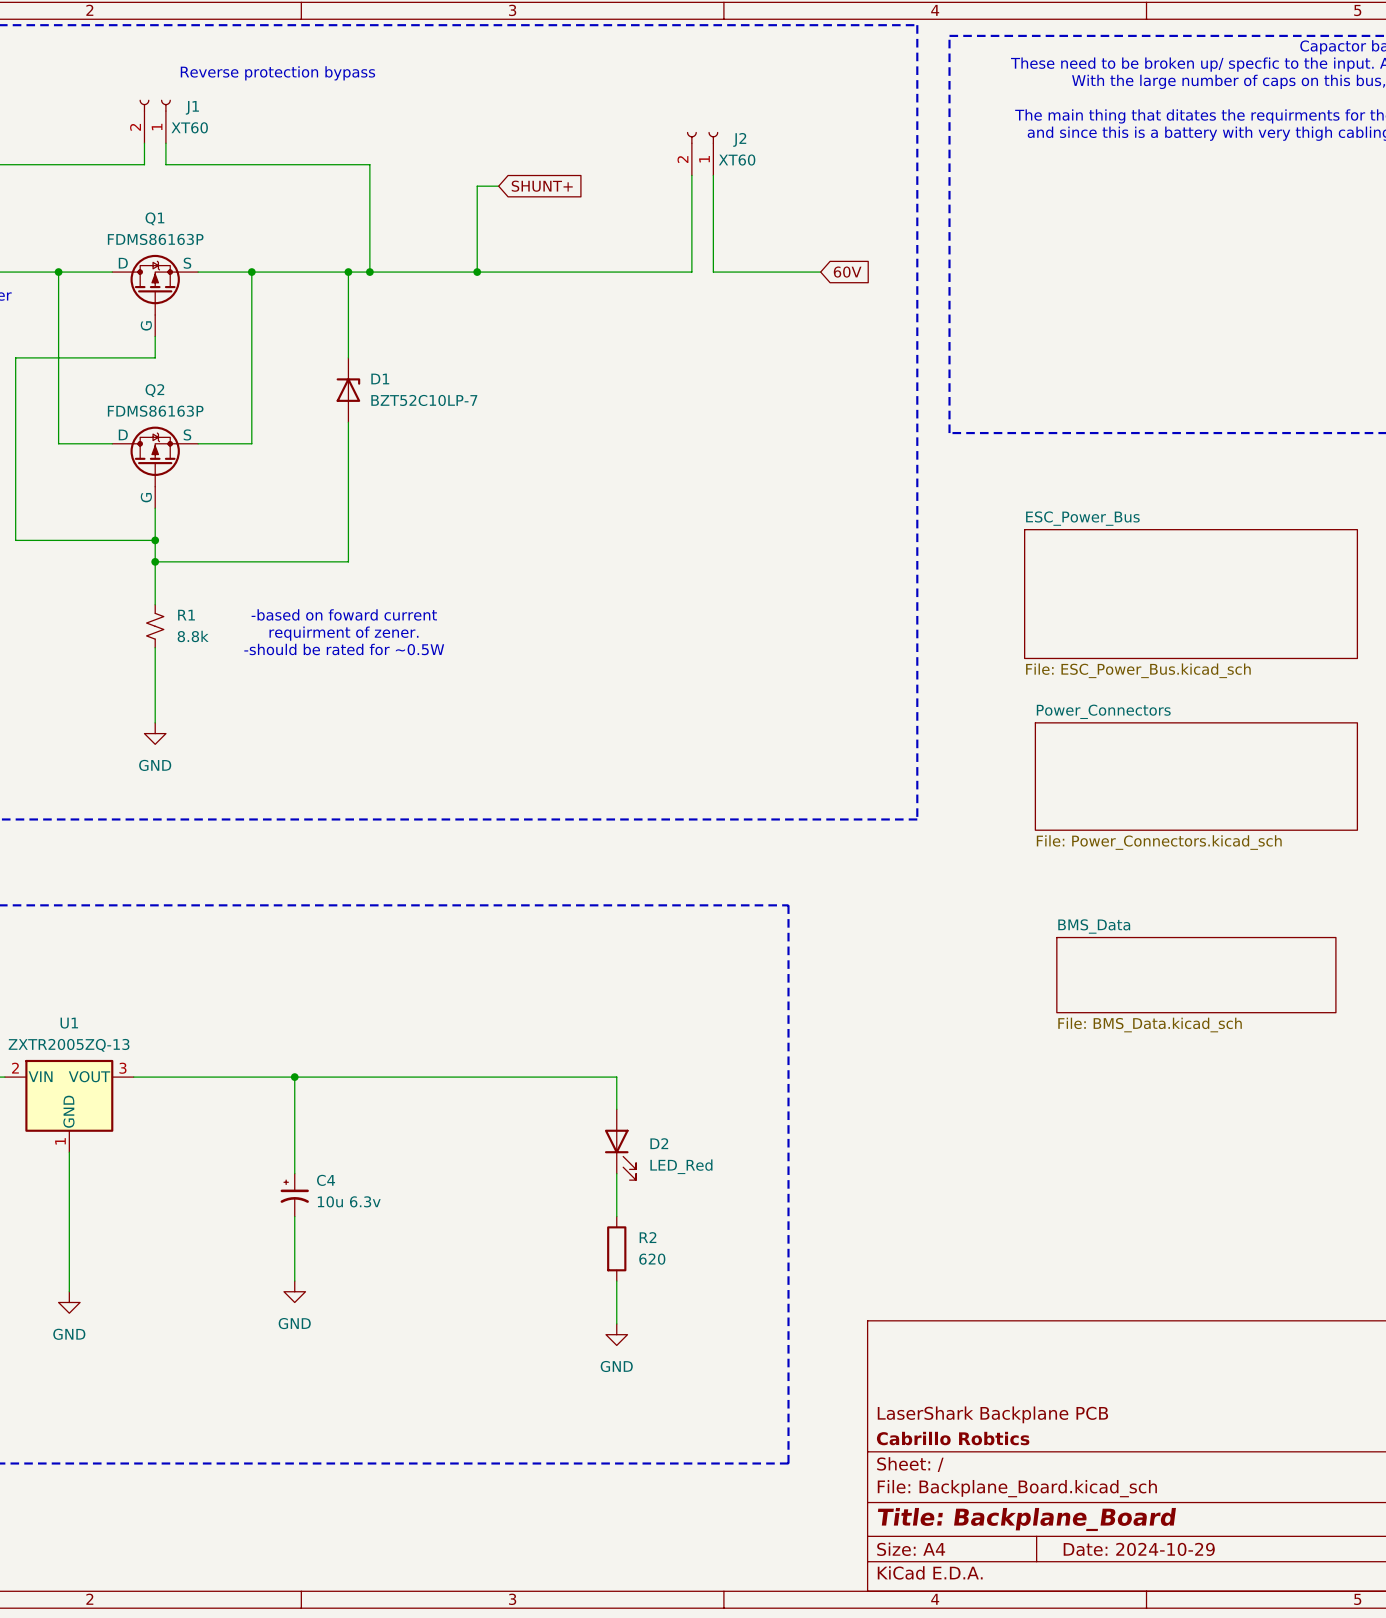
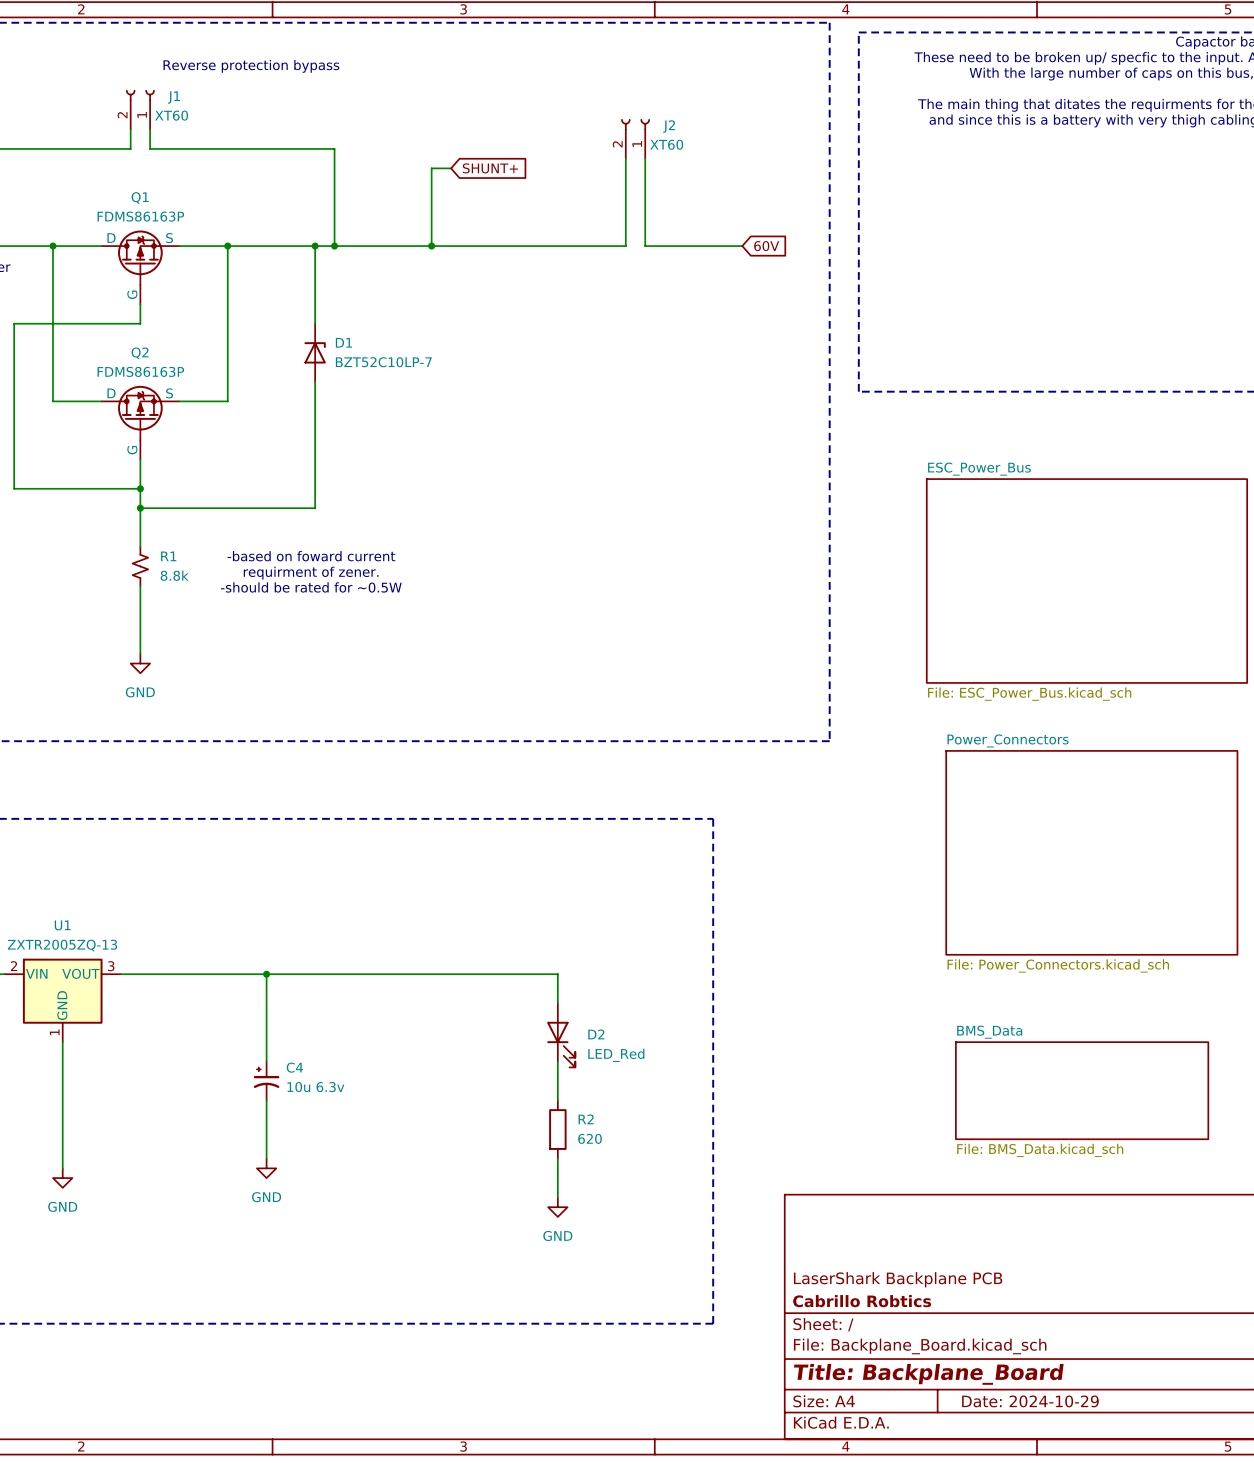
sheet ESC_Power_Bus: File: ESC_Power_Bus.kicad_sch (1191, 594) -> none
sheet ESC_Power_Bus: none -> File: ESC_Power_Bus.kicad_sch (1086, 581)
sheet Power_Connectors: File: Power_Connectors.kicad_sch (1196, 776) -> none
sheet Power_Connectors: none -> File: Power_Connectors.kicad_sch (1091, 852)
sheet BMS_Data: File: BMS_Data.kicad_sch (1196, 975) -> none
sheet BMS_Data: none -> File: BMS_Data.kicad_sch (1082, 1090)

